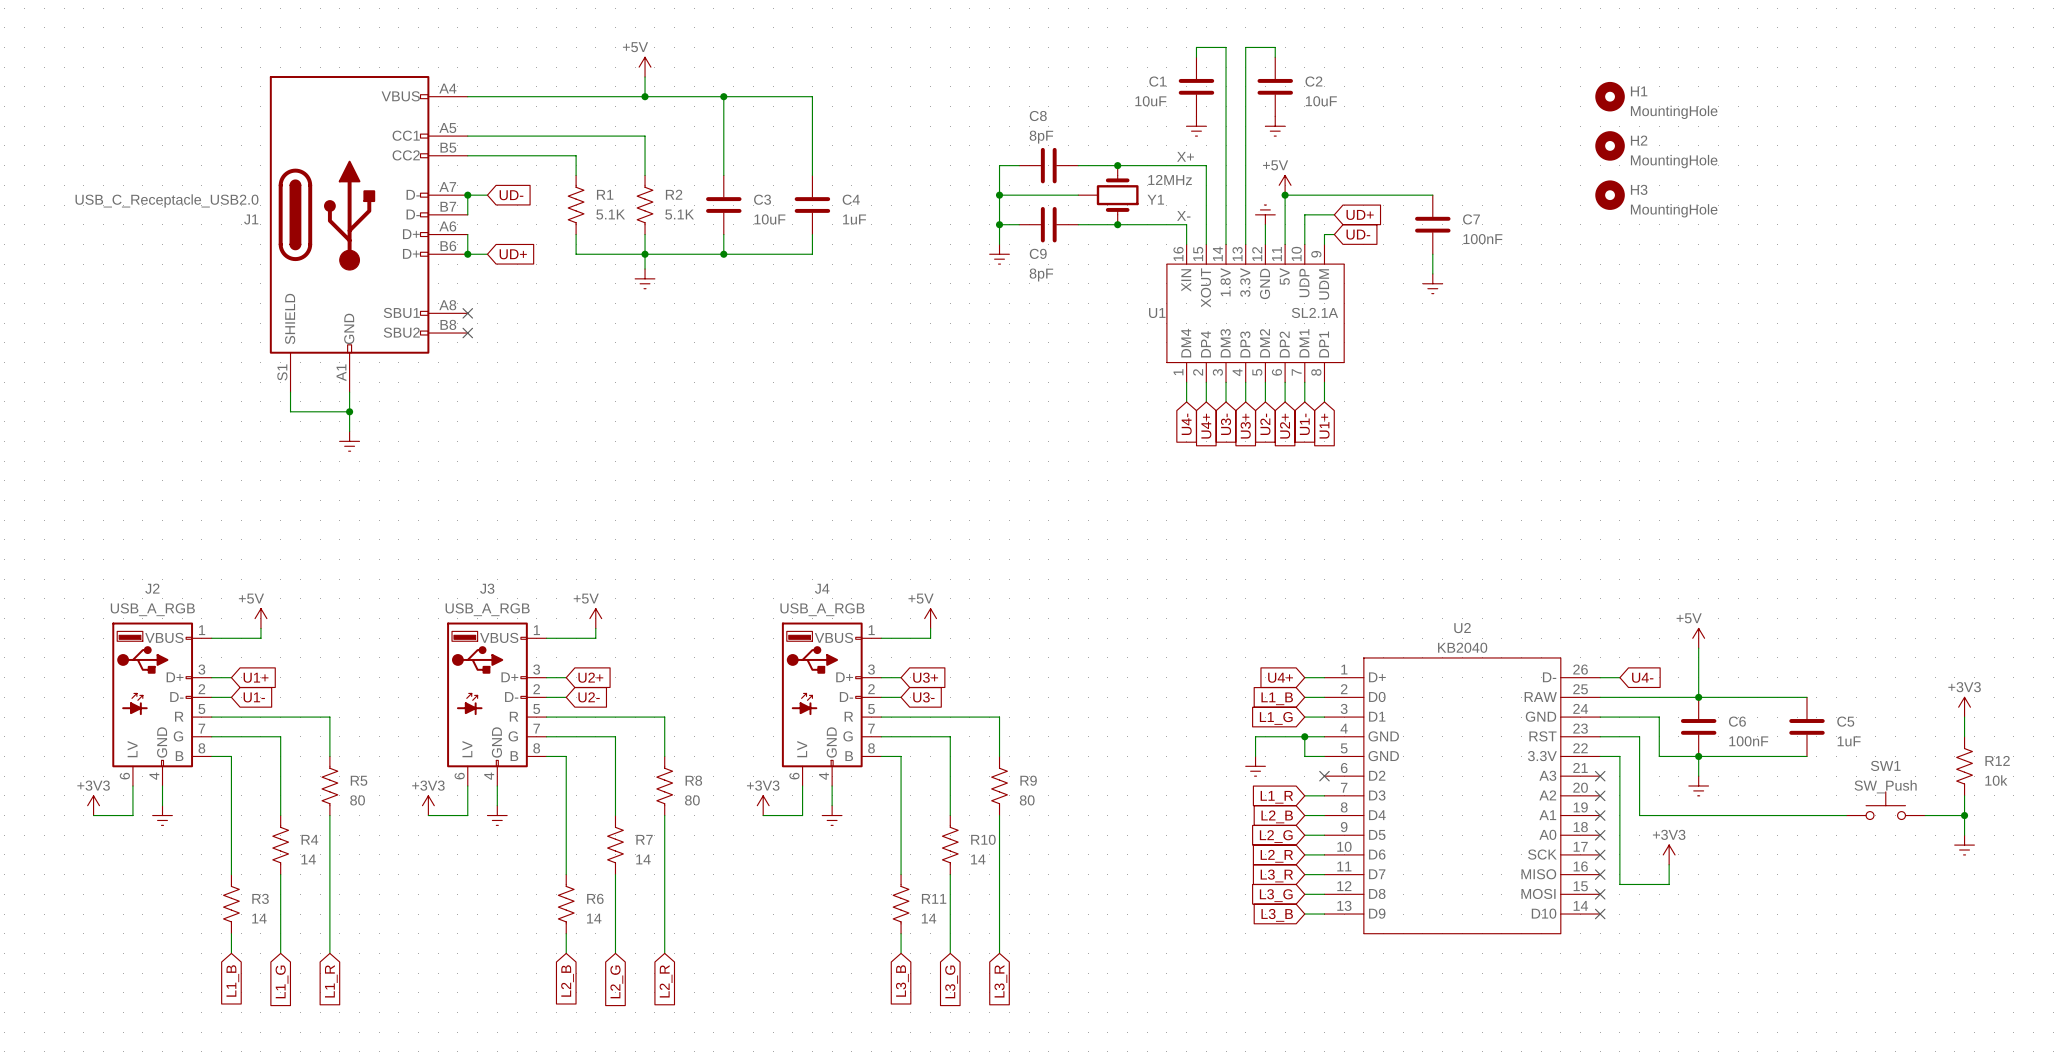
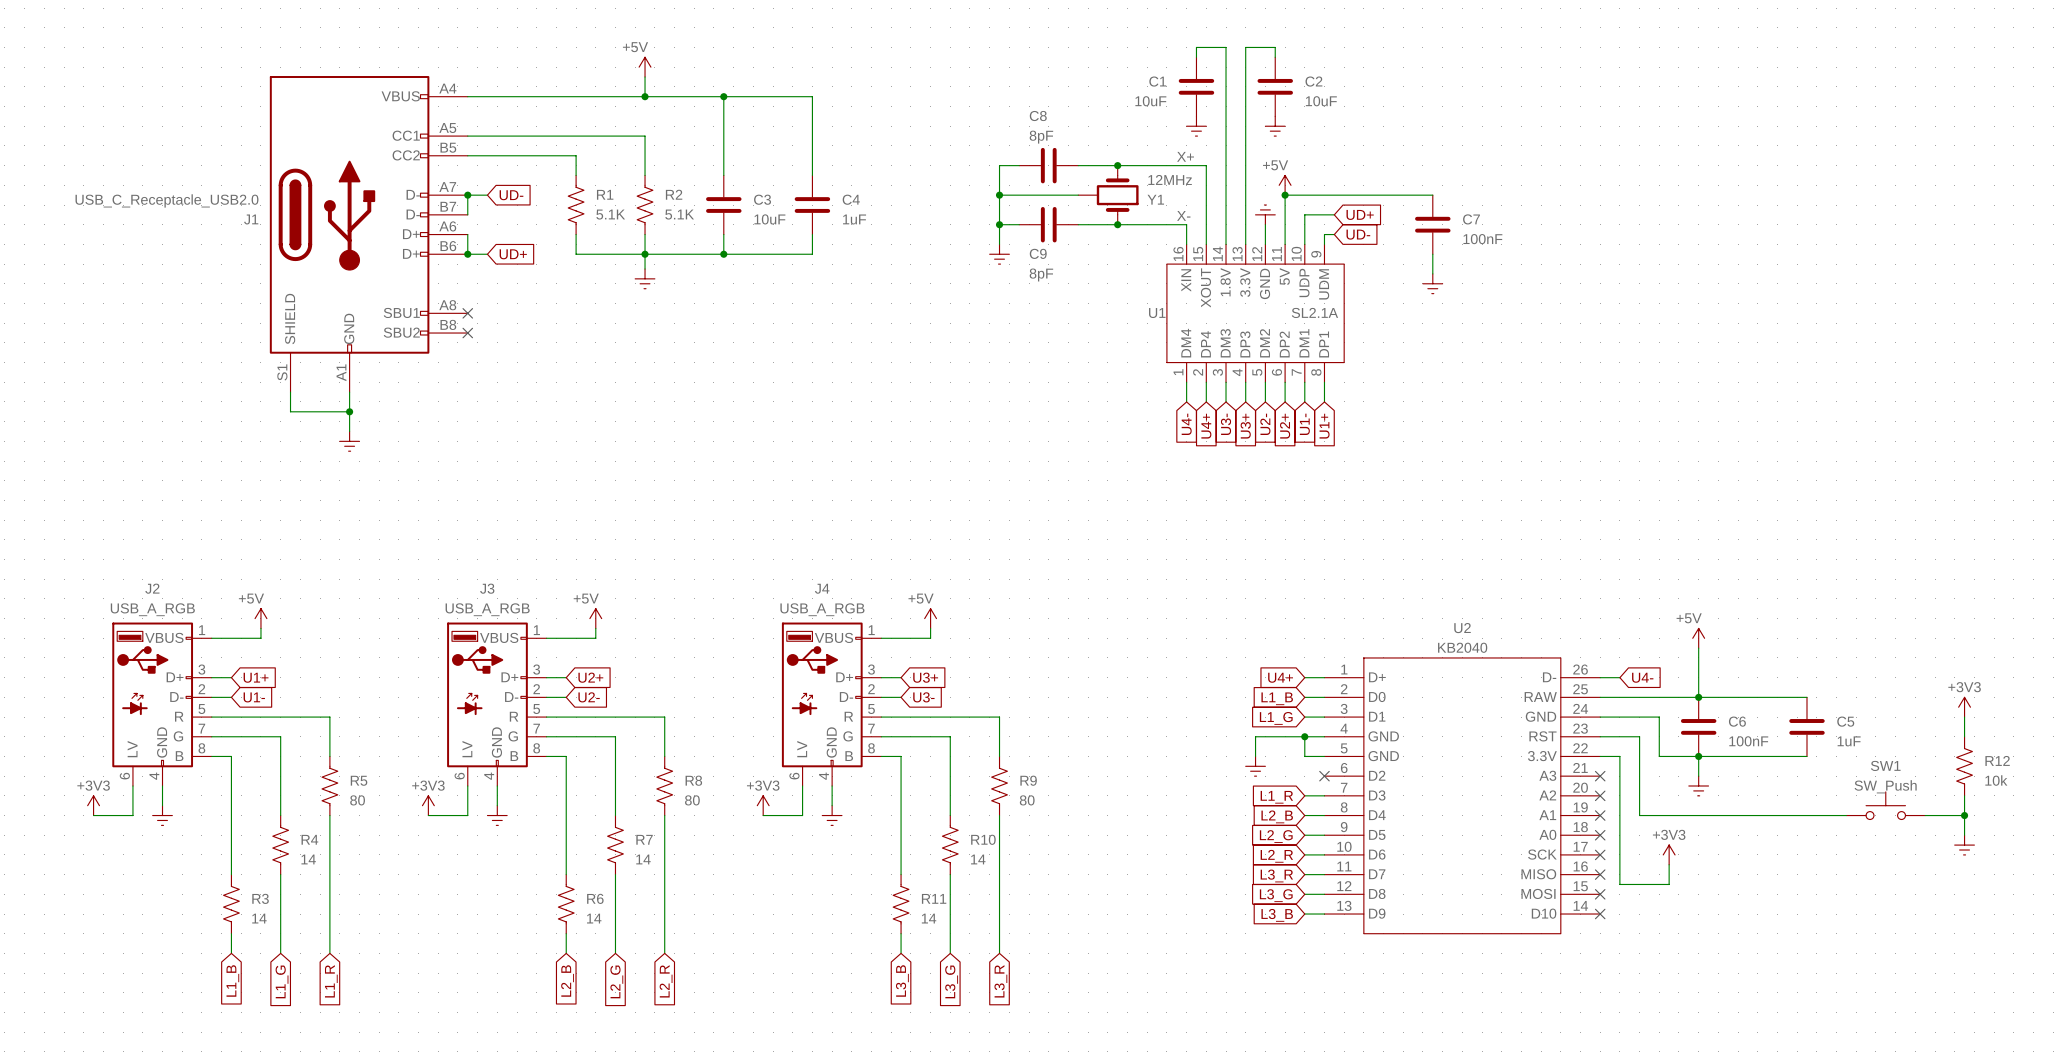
H1: MountingHole (1610, 96) -> none
H2: MountingHole (1610, 145) -> none
H3: MountingHole (1610, 195) -> none

